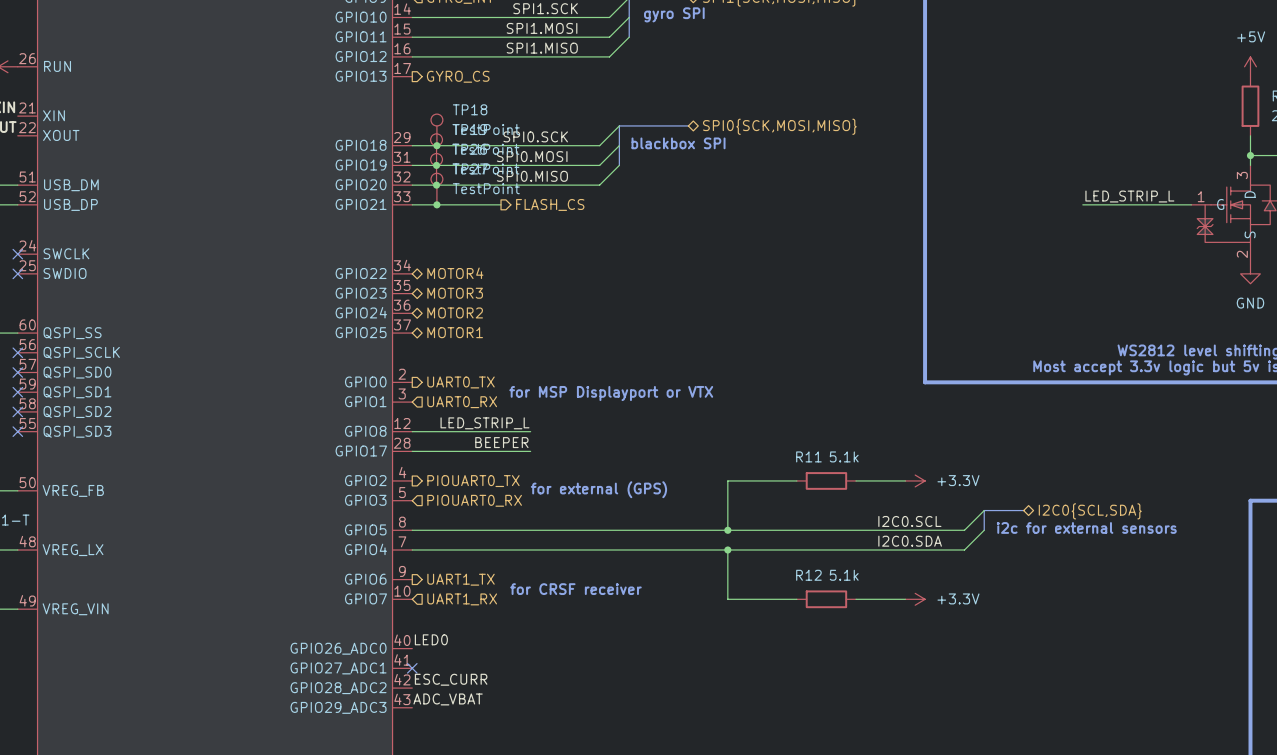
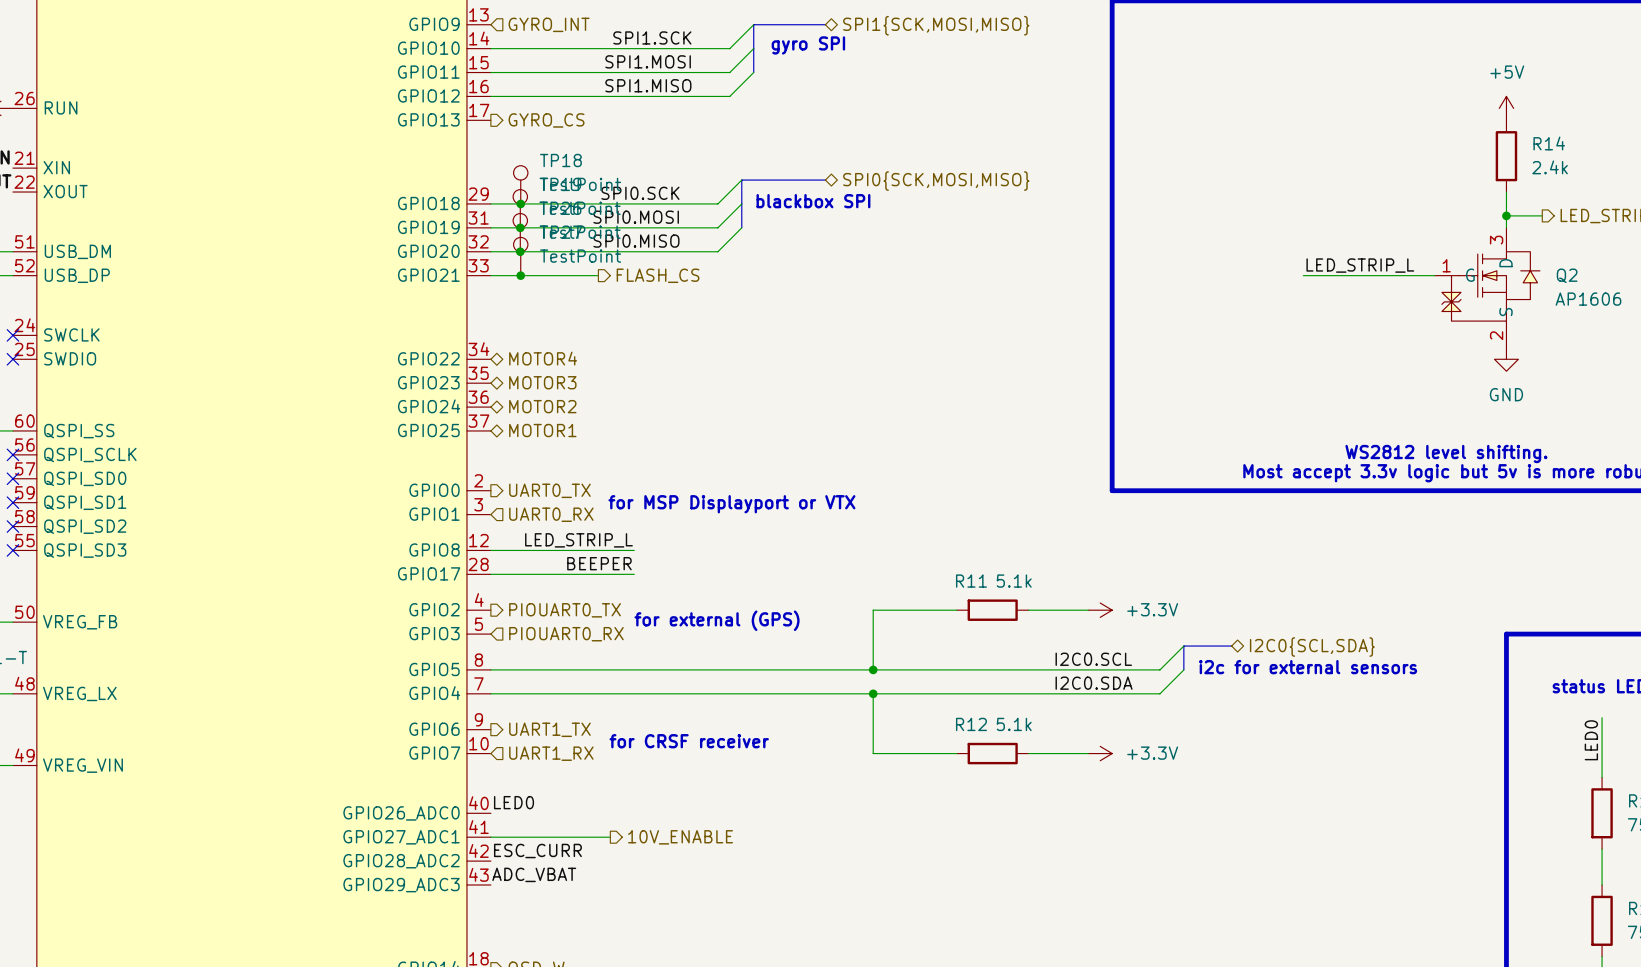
wire: none -> (490, 837) (610, 837)
no-connect mark: (412, 668) -> none
hierarchical label: none -> 10V_ENABLE (680, 837)

